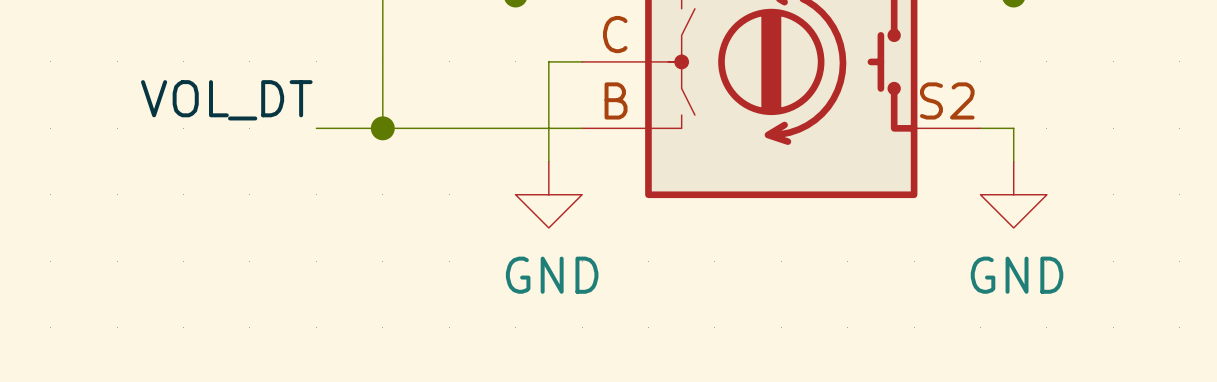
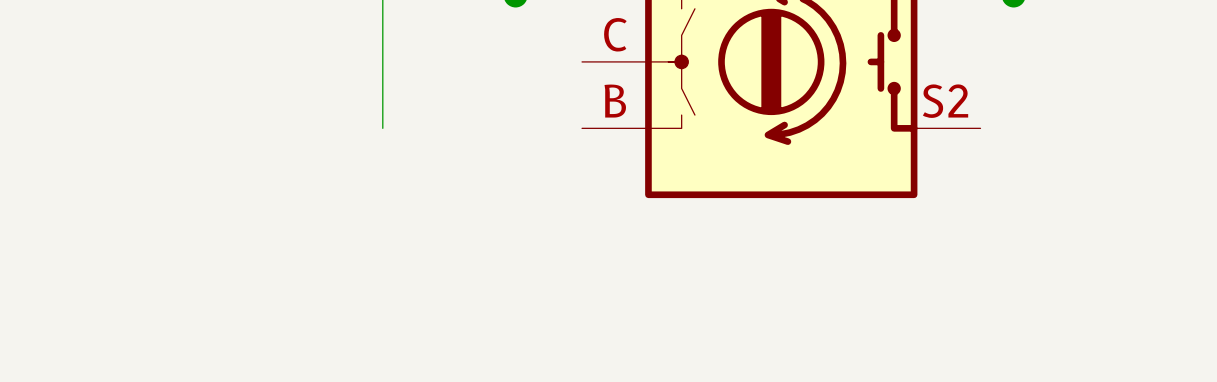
wire: (582, 61) (548, 61) (548, 161) -> none
label: VOL_DT (226, 100) -> none
wire: (316, 128) (582, 128) -> none
junction: (382, 128) -> none
wire: (980, 128) (1013, 128) (1013, 161) -> none
power symbol: GND (548, 194) -> none
power symbol: GND (1013, 194) -> none

